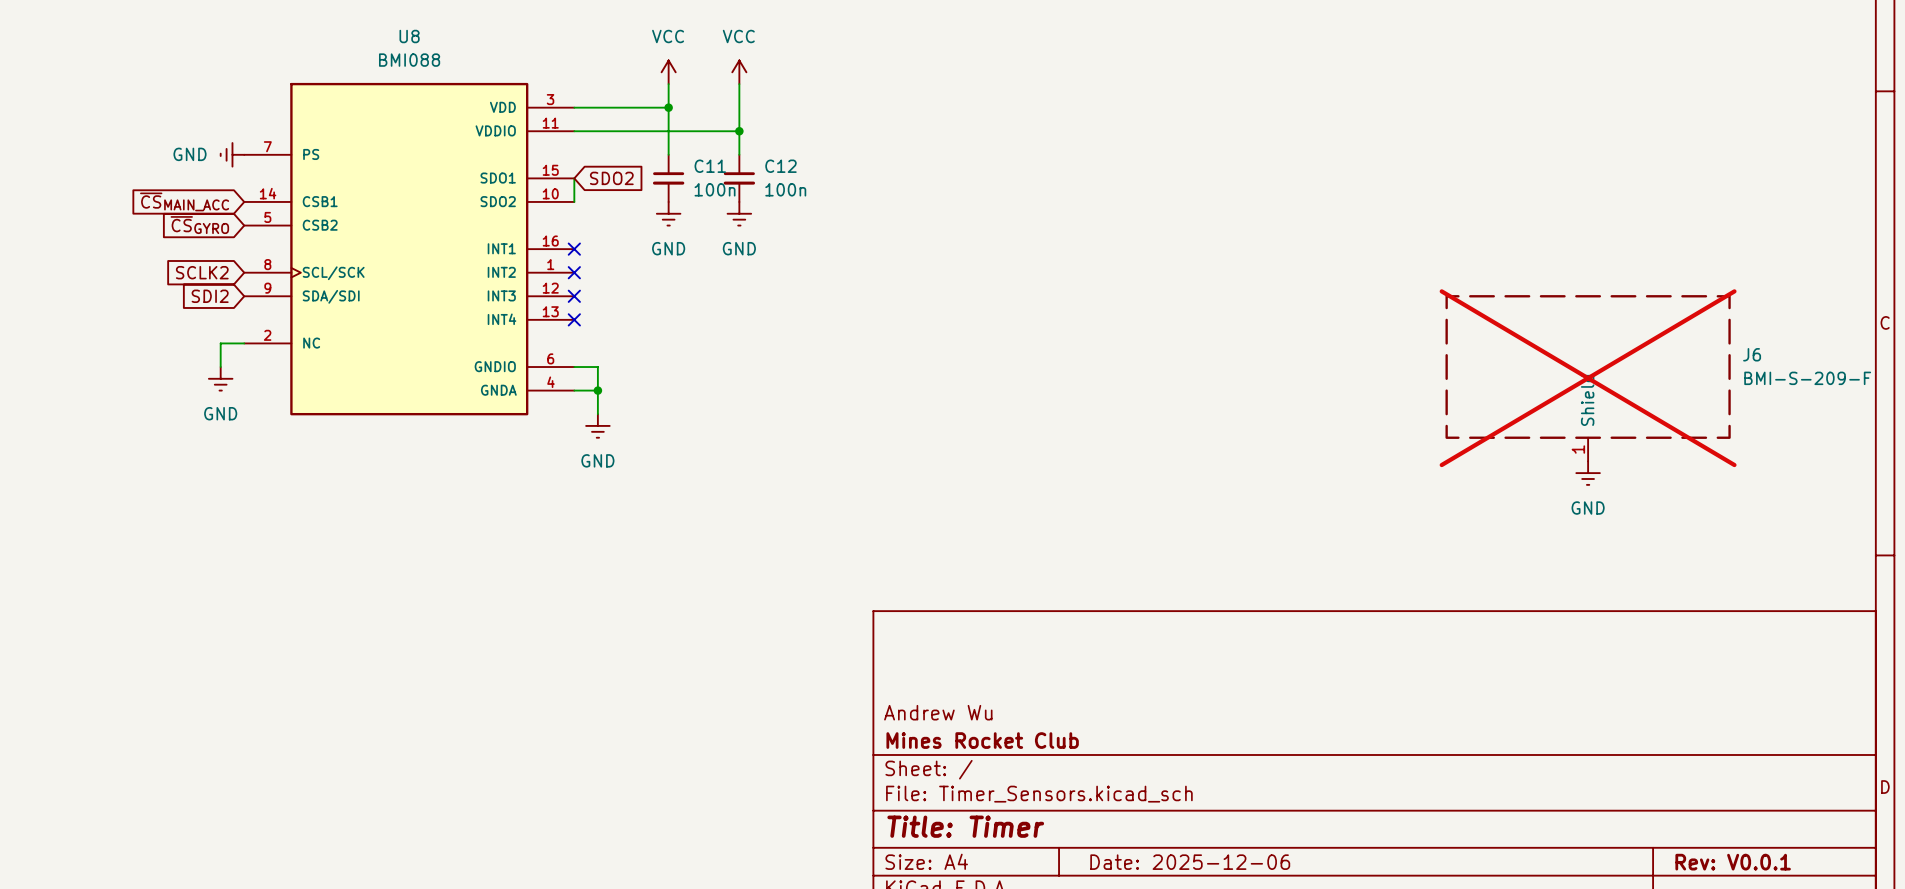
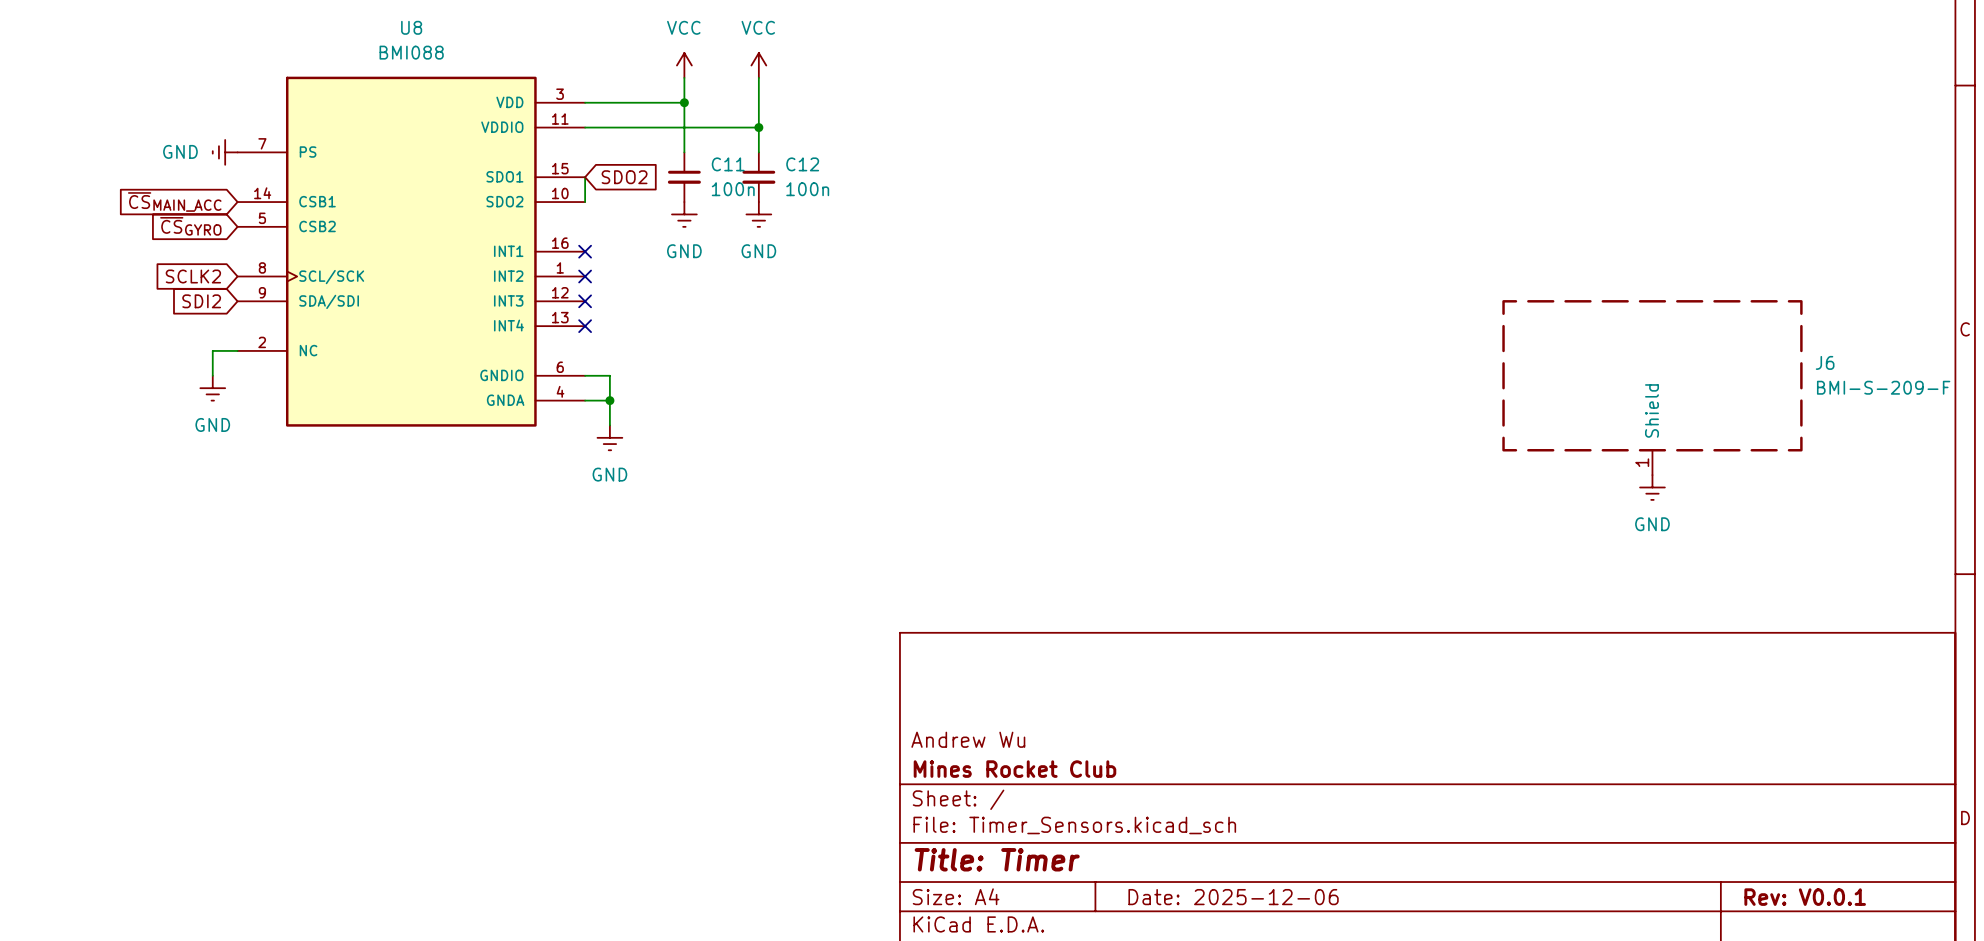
J6 do-not-place cross: (1588, 378) -> none

